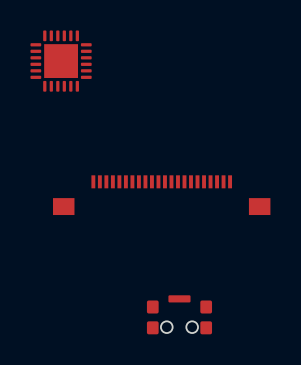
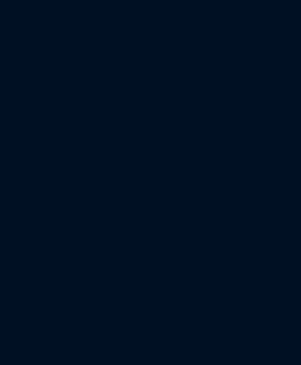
part: (61, 61) -> none
part: (161, 195) -> none
part: (179, 314) -> none

